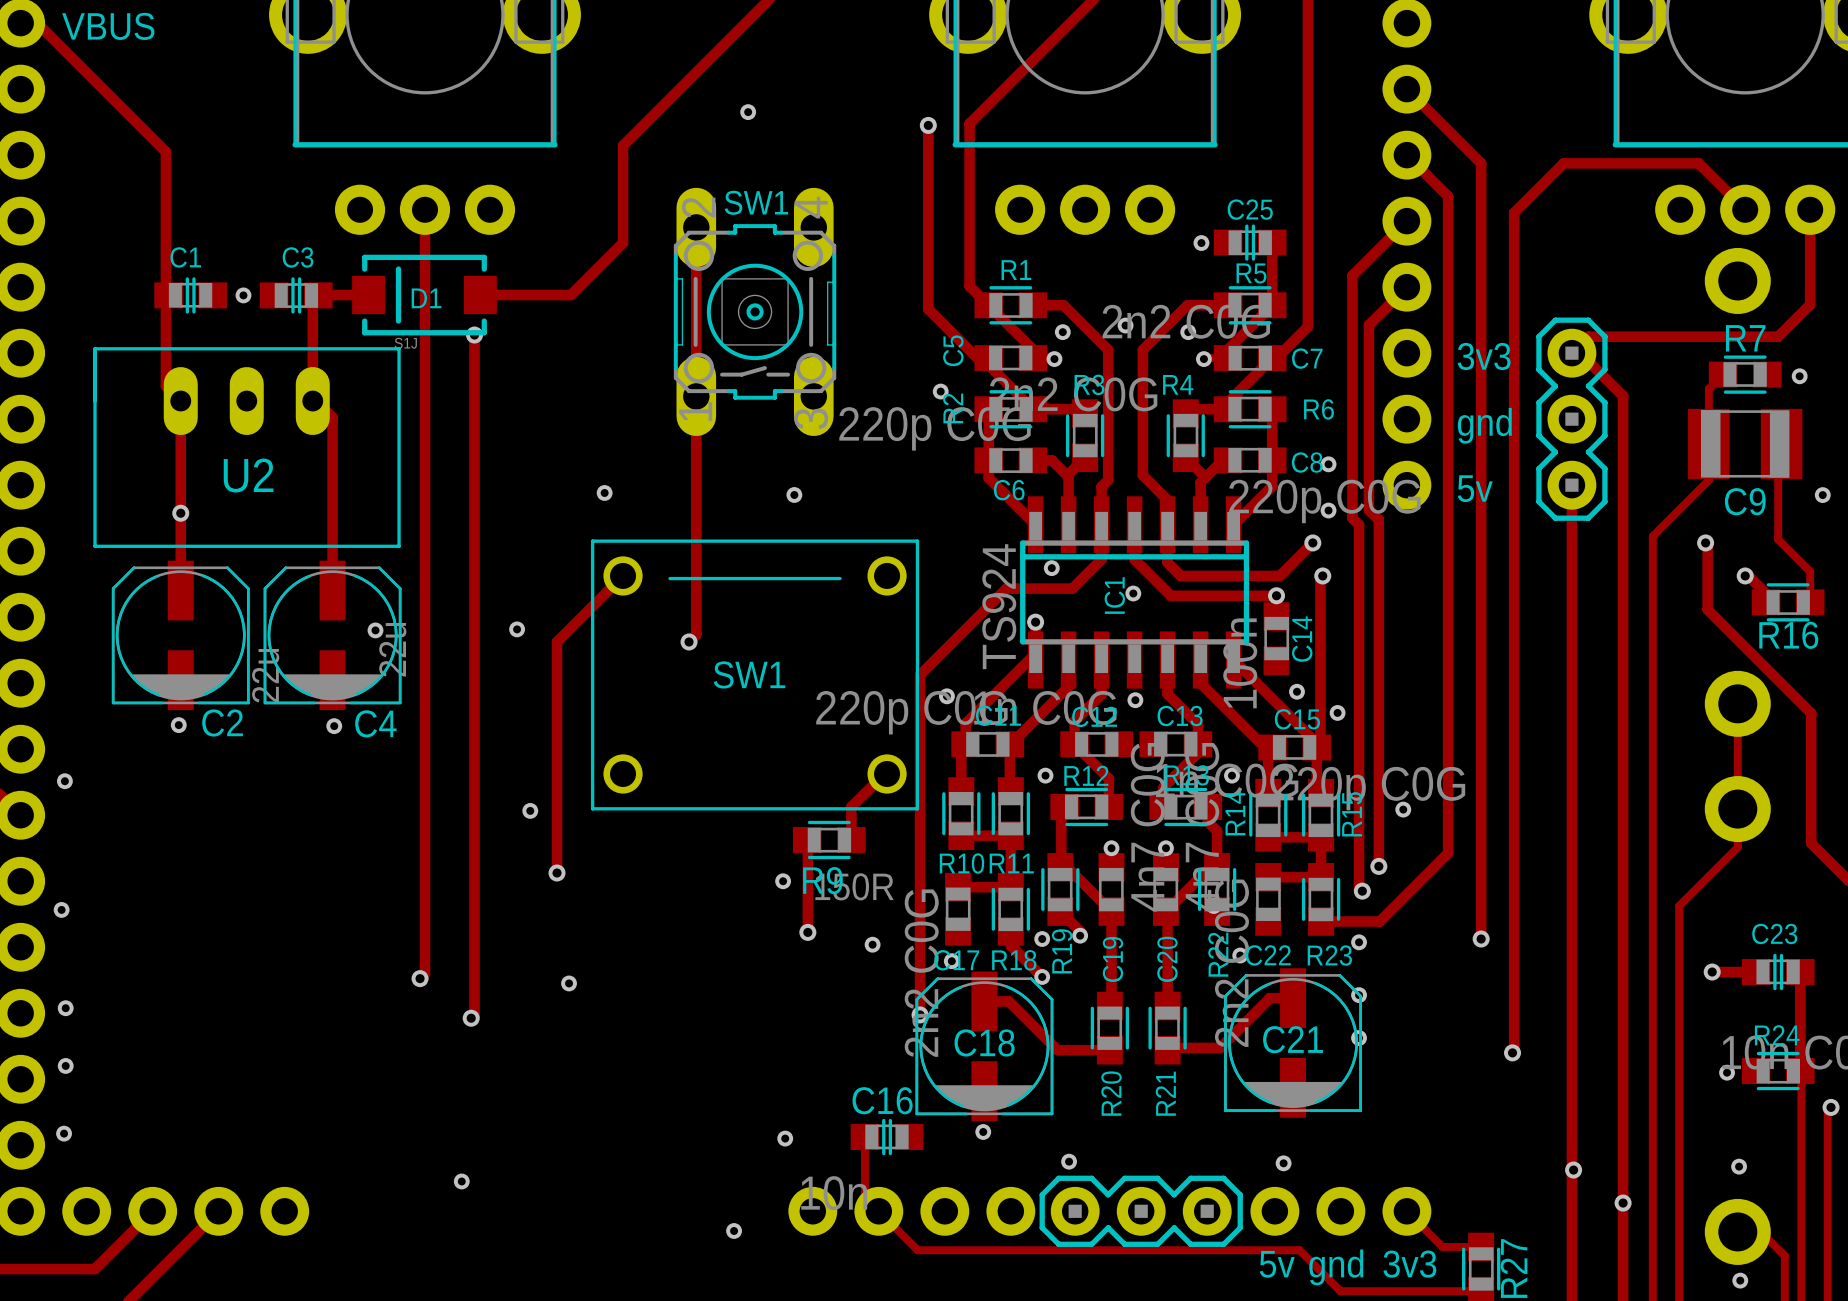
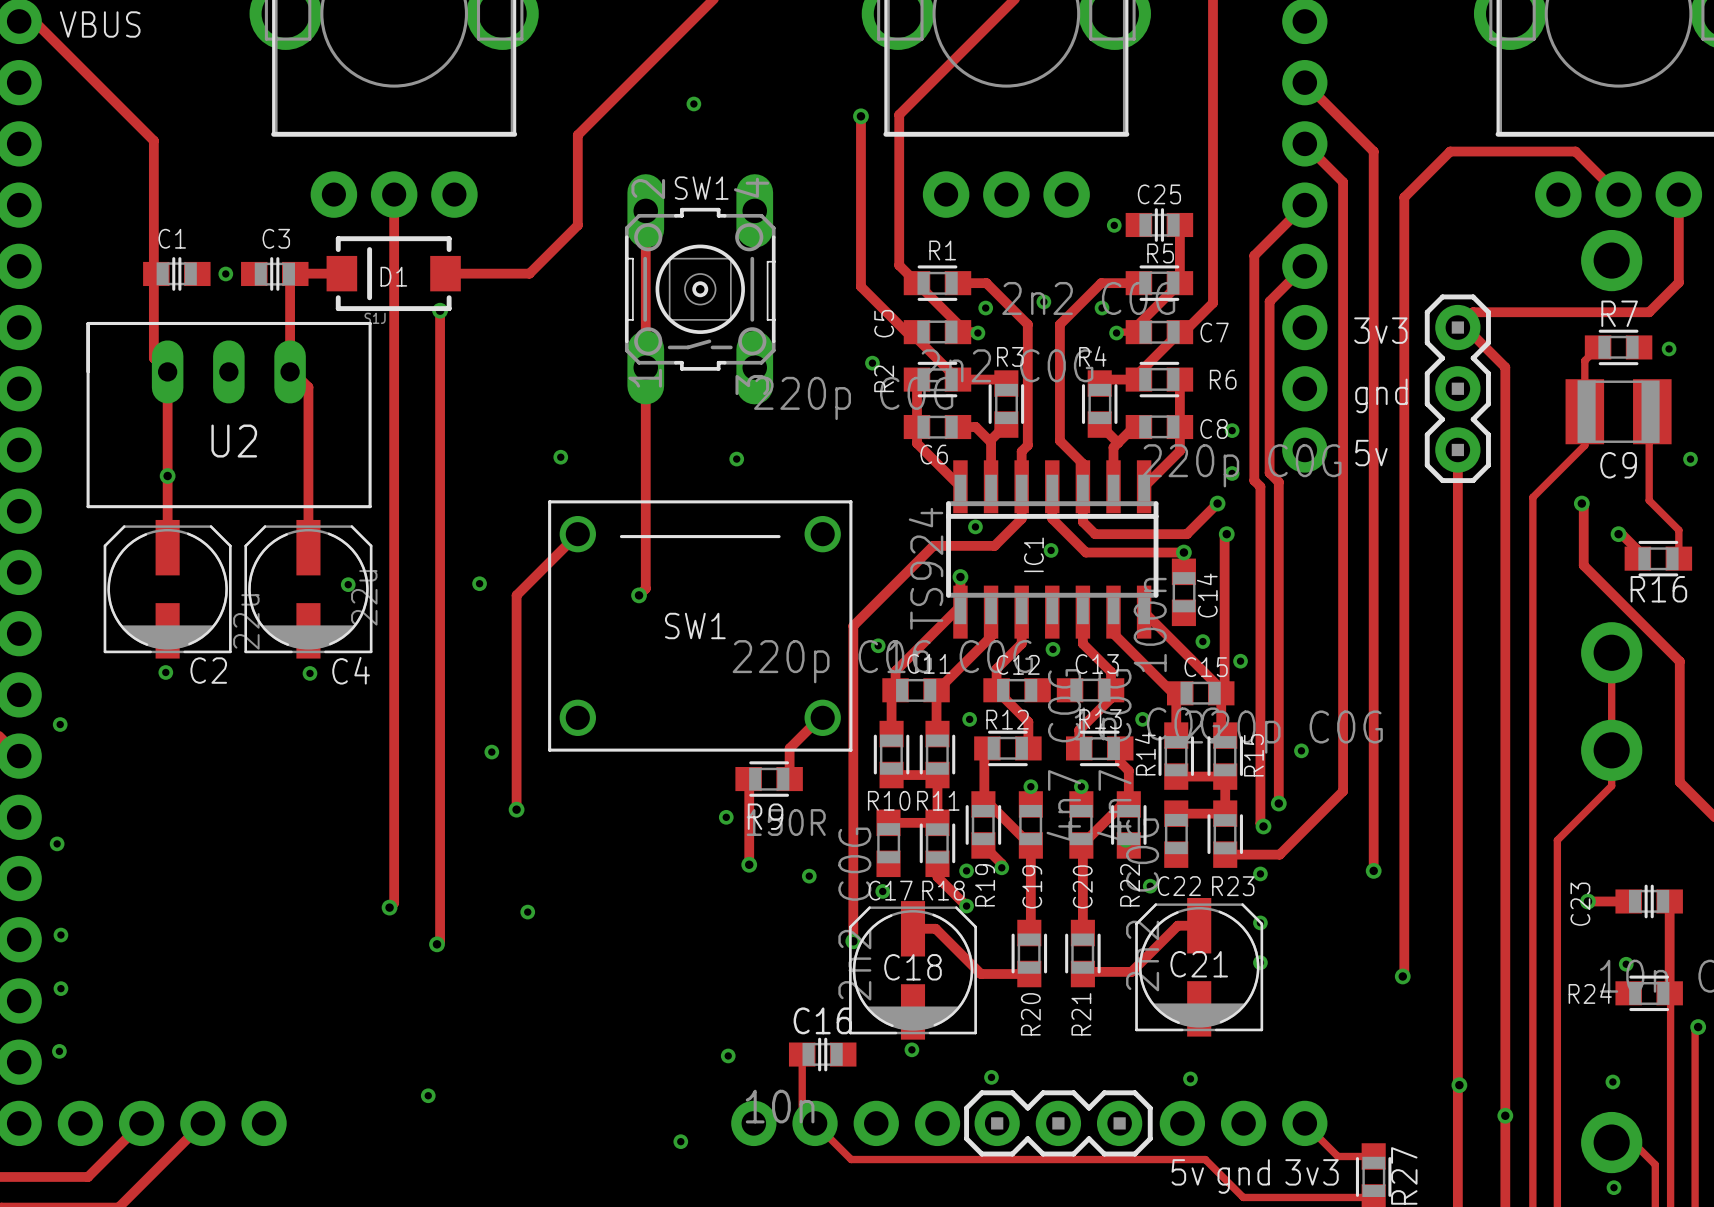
C23 name rotation: 0° (1774, 933) -> 90° counterclockwise (1580, 904)
C23 name position: C23 (1774, 933) -> C23 (1580, 904)
R24 name position: R24 (1777, 1035) -> R24 (1590, 993)
via position: (1727, 1072) -> (1626, 964)

